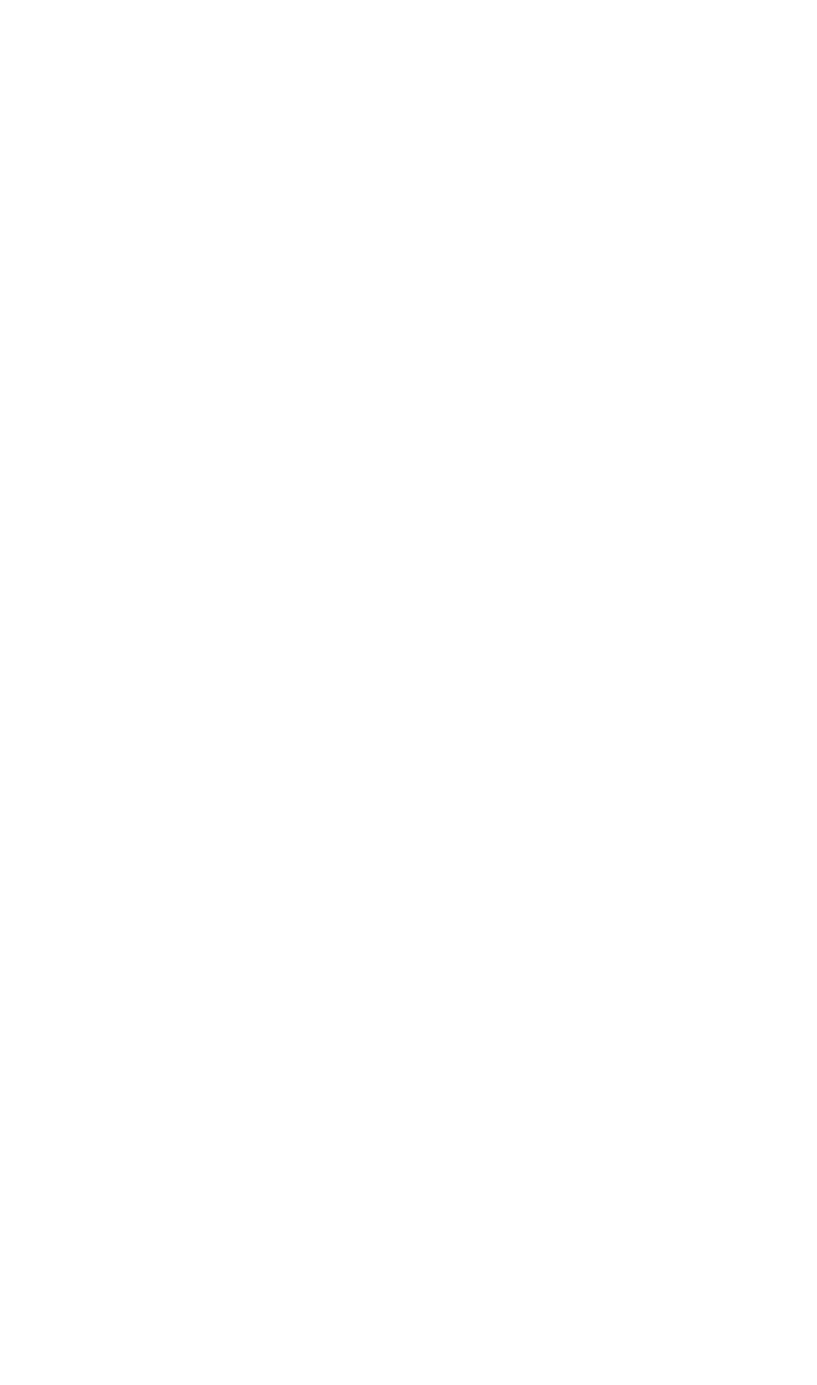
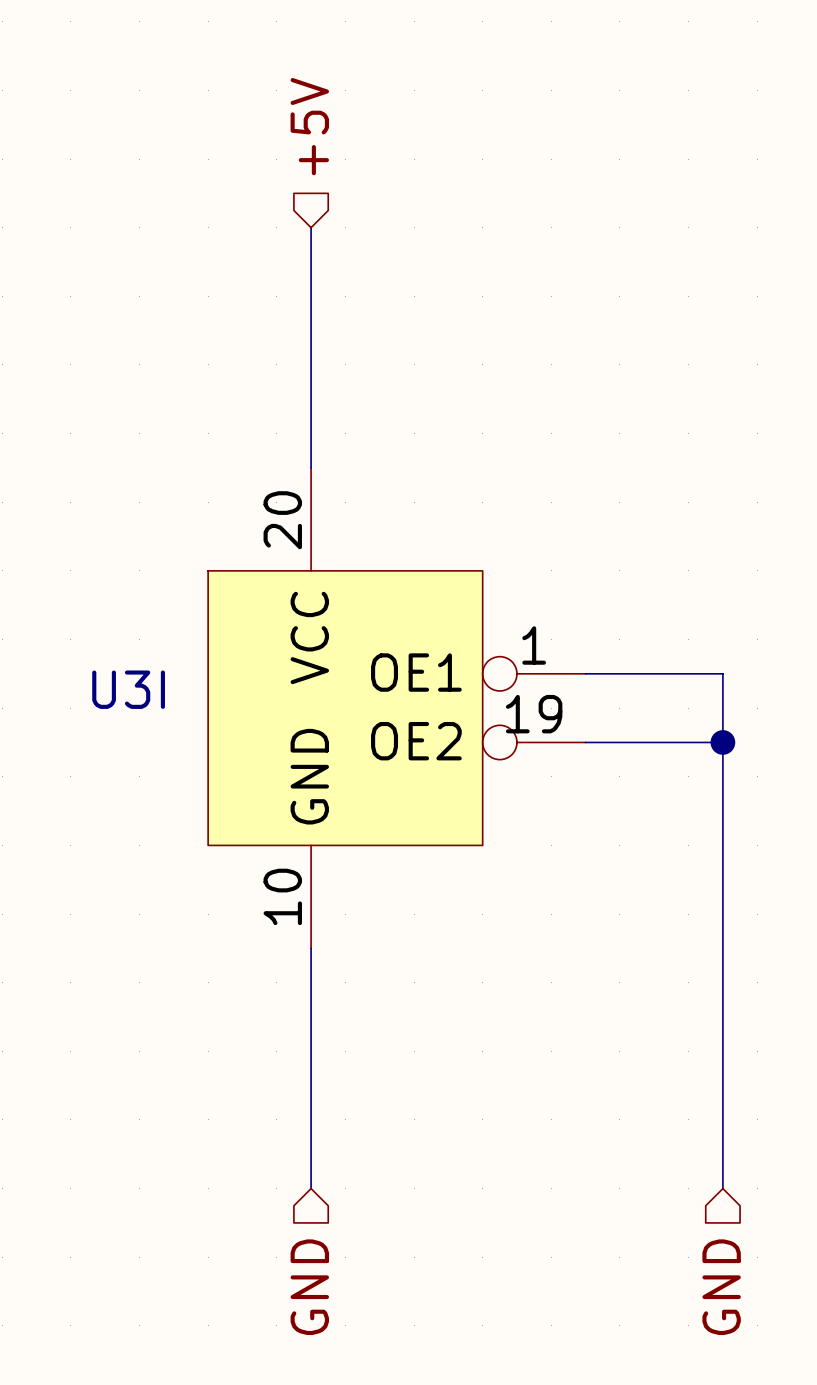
hierarchical label: none -> +5V (309, 126)
wire: none -> (311, 227) (311, 467)
wire: none -> (585, 673) (722, 673) (722, 1188)
U3I: none -> (396, 708)
wire: none -> (585, 742) (722, 742)
junction: none -> (722, 742)
wire: none -> (311, 948) (311, 1188)
hierarchical label: none -> GND (309, 1287)
hierarchical label: none -> GND (721, 1287)

